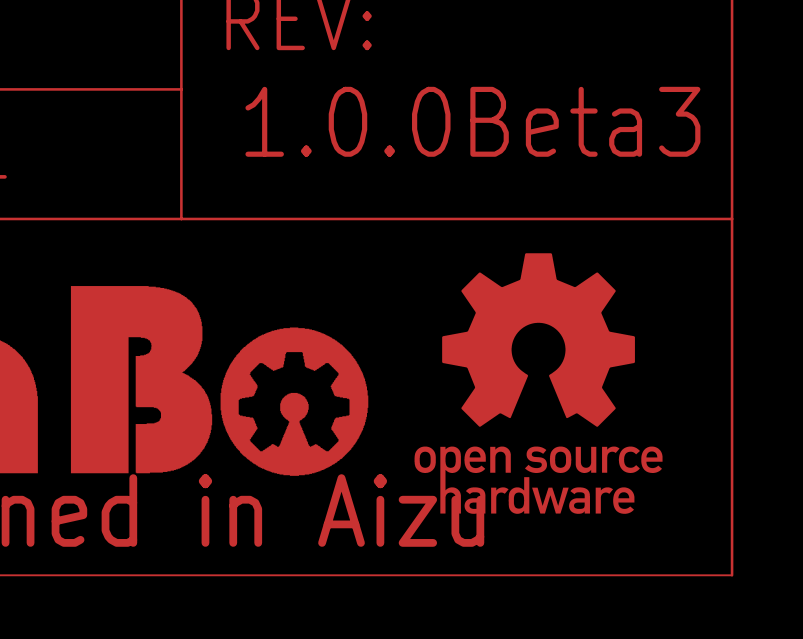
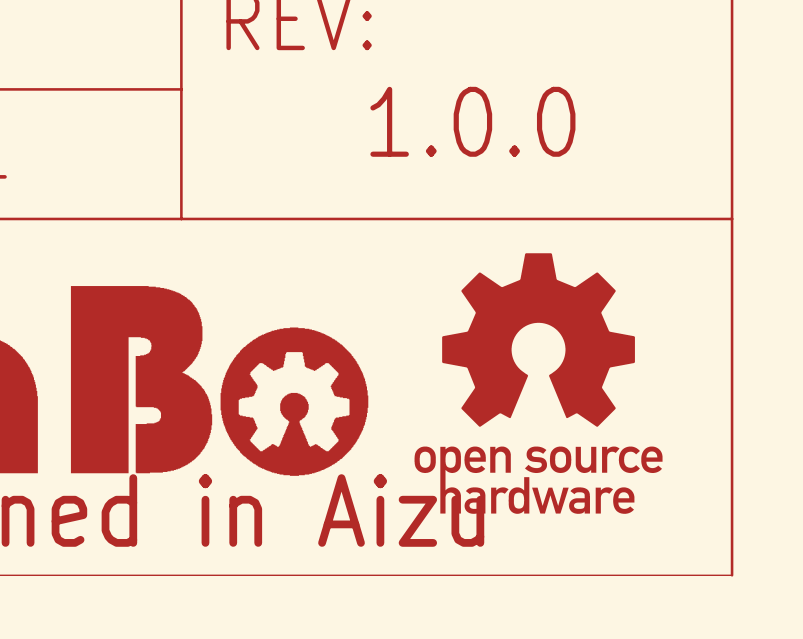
text: 1.0.0Beta3 (472, 121) -> 1.0.0 (472, 121)

